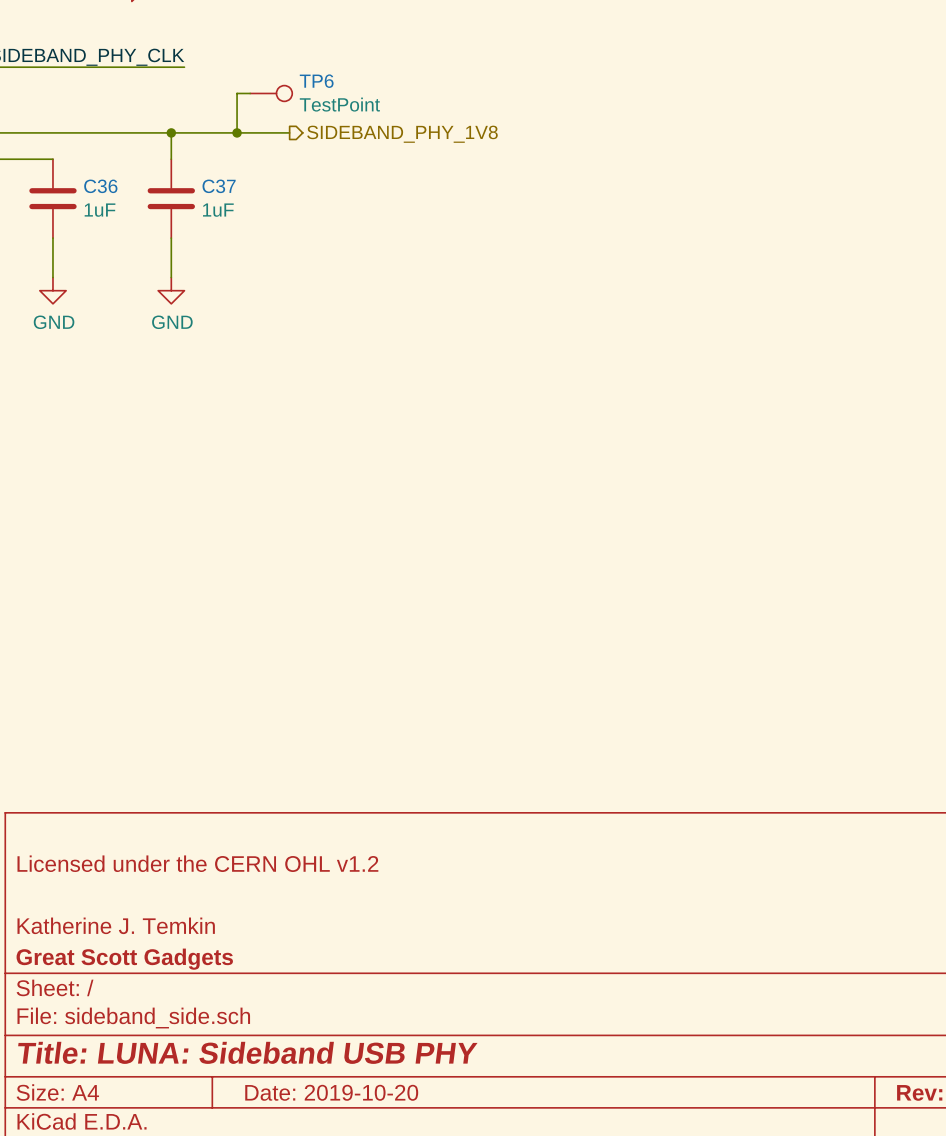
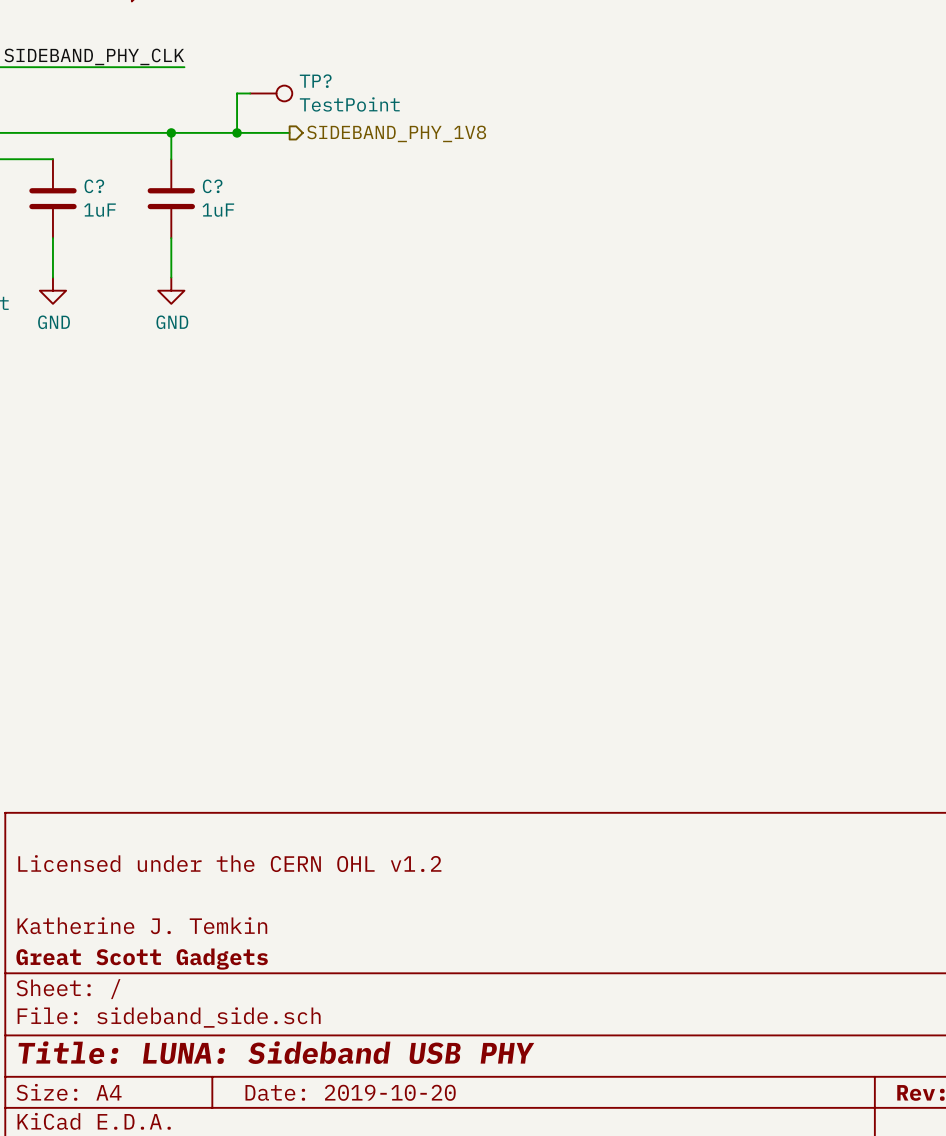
TP6 name: TP6 (316, 81) -> TP? (315, 81)
C36 name: C36 (100, 186) -> C? (94, 186)
C37 name: C37 (219, 186) -> C? (212, 186)

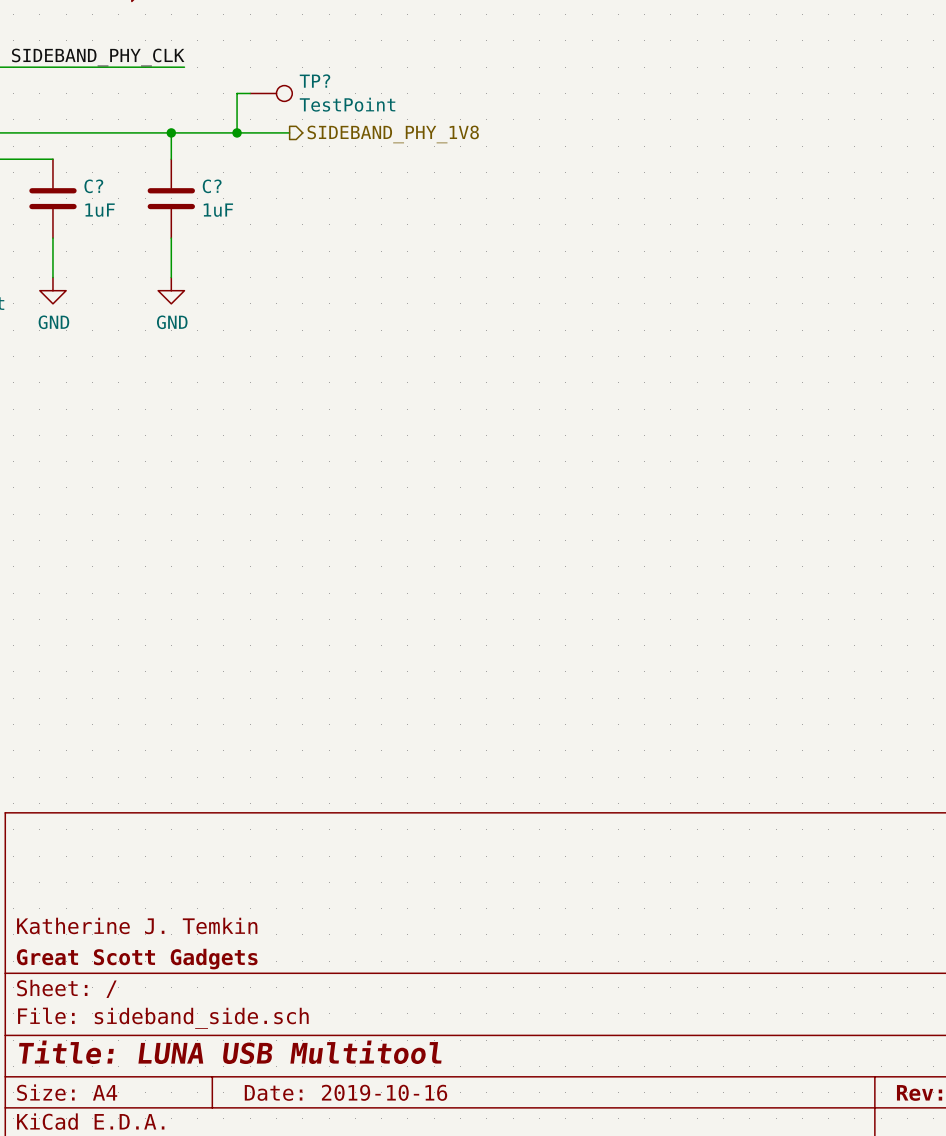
title block: Licensed under the CERN OHL v1.2 (229, 863) -> none
title block: Title: LUNA: Sideband USB PHY (276, 1052) -> Title: LUNA USB Multitool (230, 1052)
title block: Date: 2019-10-20 (350, 1092) -> Date: 2019-10-16 (345, 1092)

